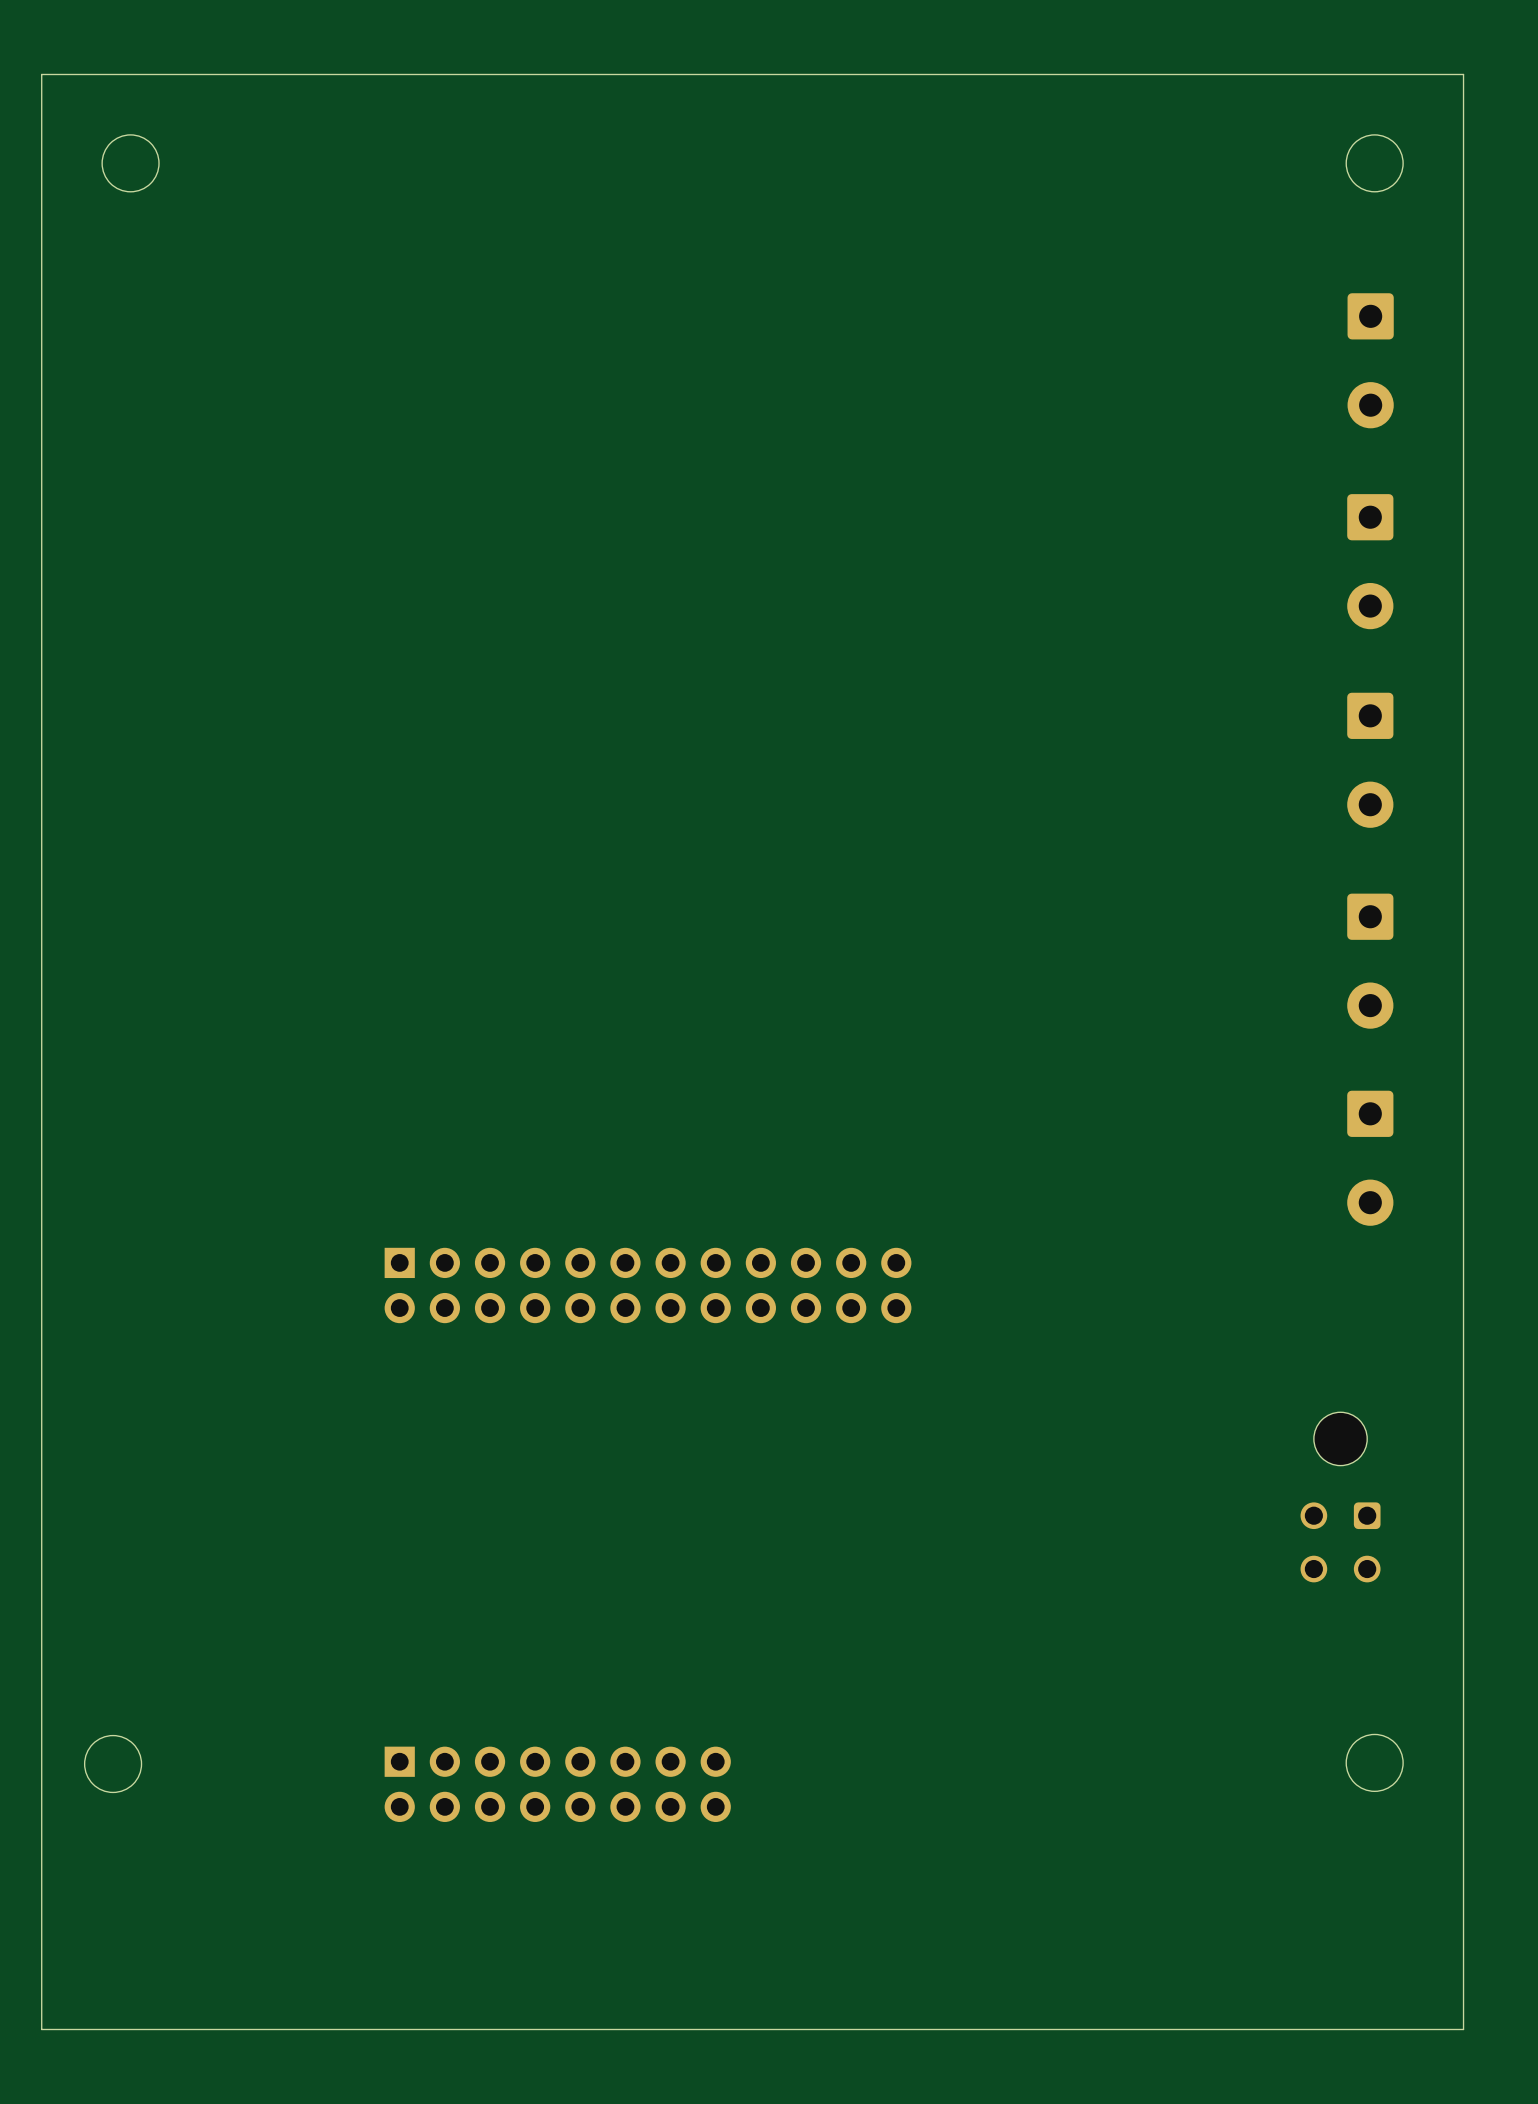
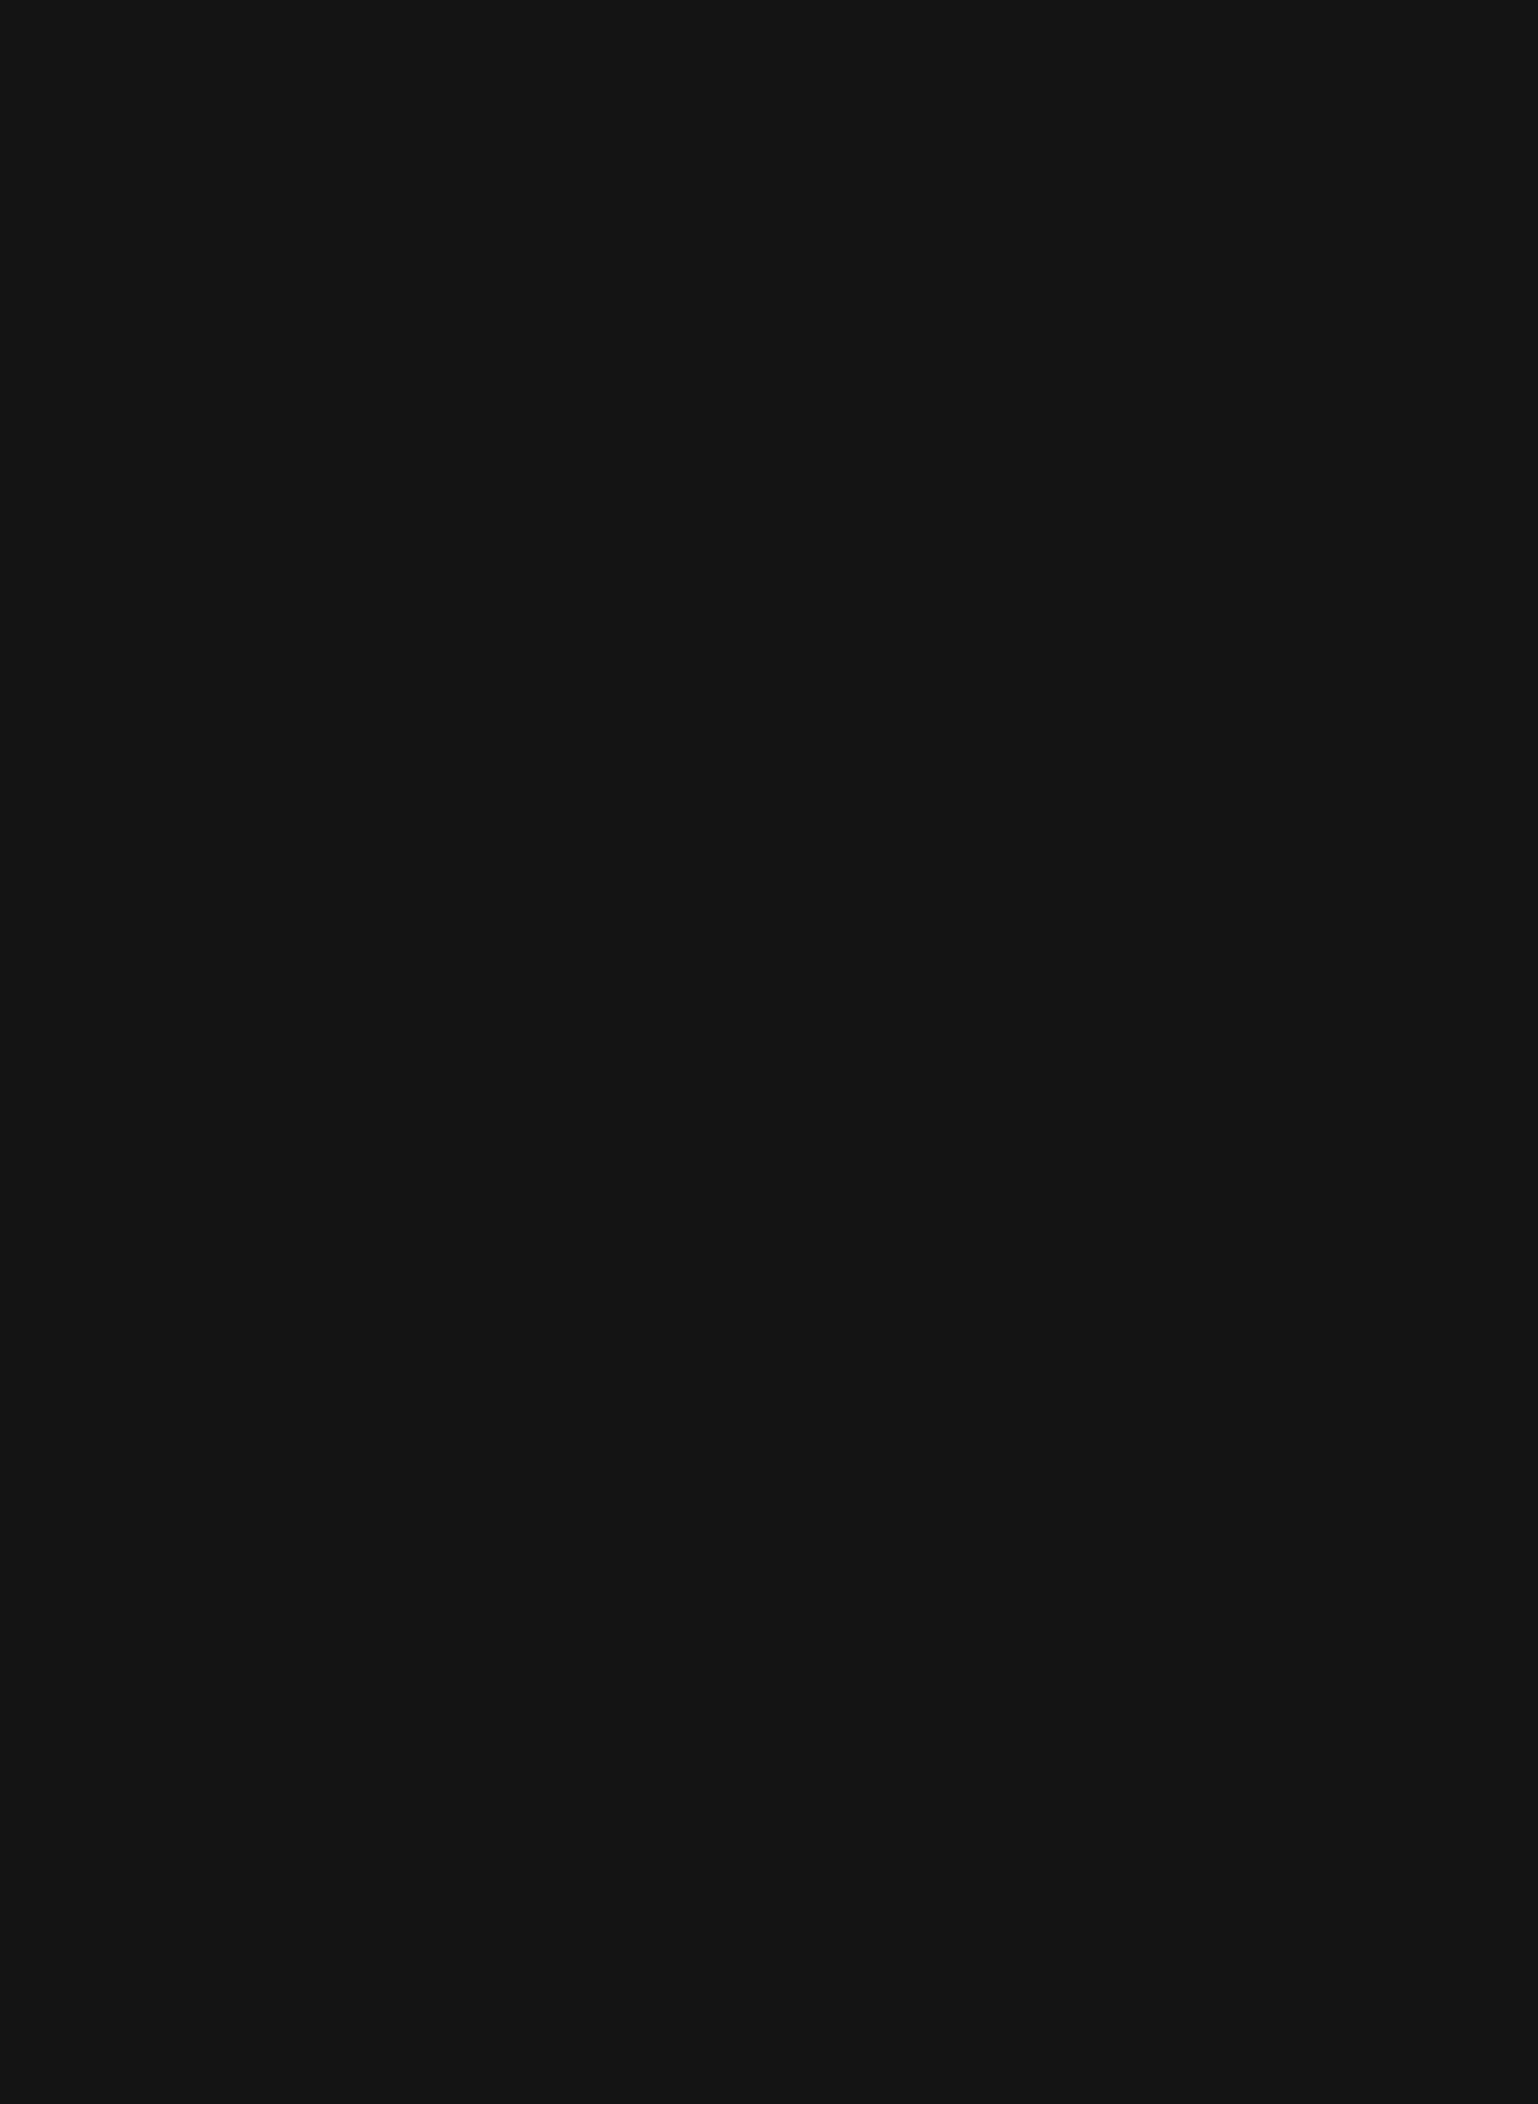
board edge: (1463, 74) (41, 74) (41, 2029) (1463, 2029) (1463, 74) -> none
round board edge: [101, 134, 160, 193] -> none
round board edge: [1345, 134, 1404, 193] -> none
part: (1370, 360) -> none
part: (1370, 561) -> none
part: (1370, 760) -> none
part: (1370, 961) -> none
part: (1370, 1158) -> none
part: (648, 1285) -> none
part: (1340, 1497) -> none
round board edge: [1345, 1734, 1404, 1792] -> none
round board edge: [84, 1735, 142, 1793] -> none
part: (557, 1784) -> none

